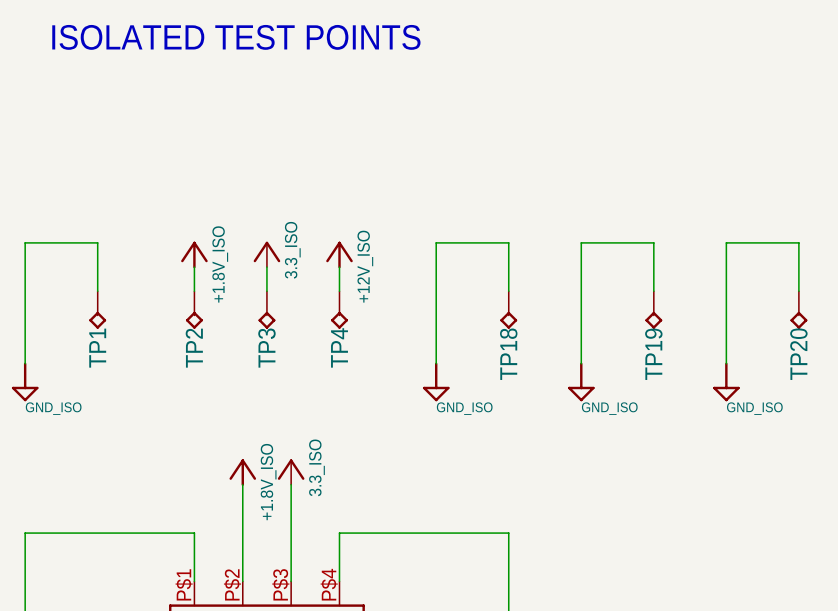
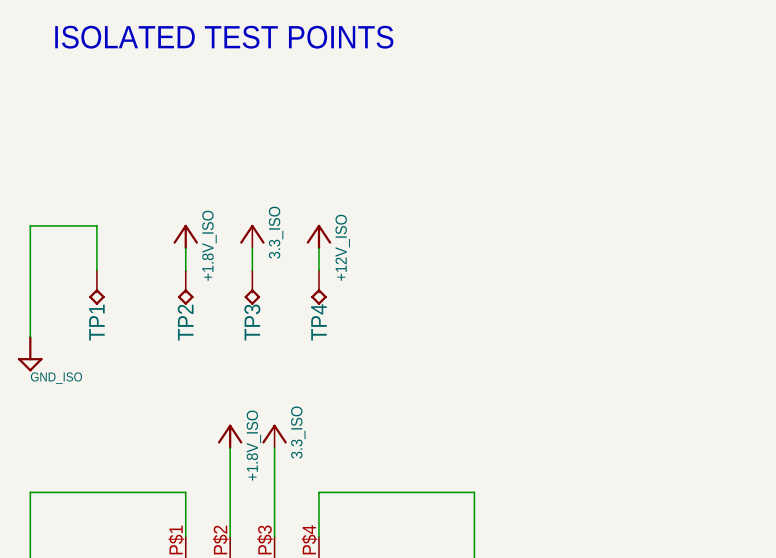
wire: (508, 291) (508, 242) (436, 242) (436, 363) -> none
wire: (653, 291) (653, 242) (581, 242) (581, 363) -> none
wire: (798, 291) (798, 242) (726, 242) (726, 363) -> none
TP18: (508, 310) -> none
TP19: (653, 310) -> none
TP20: (798, 310) -> none
power symbol: (436, 381) -> none
power symbol: (581, 381) -> none
power symbol: (726, 381) -> none

